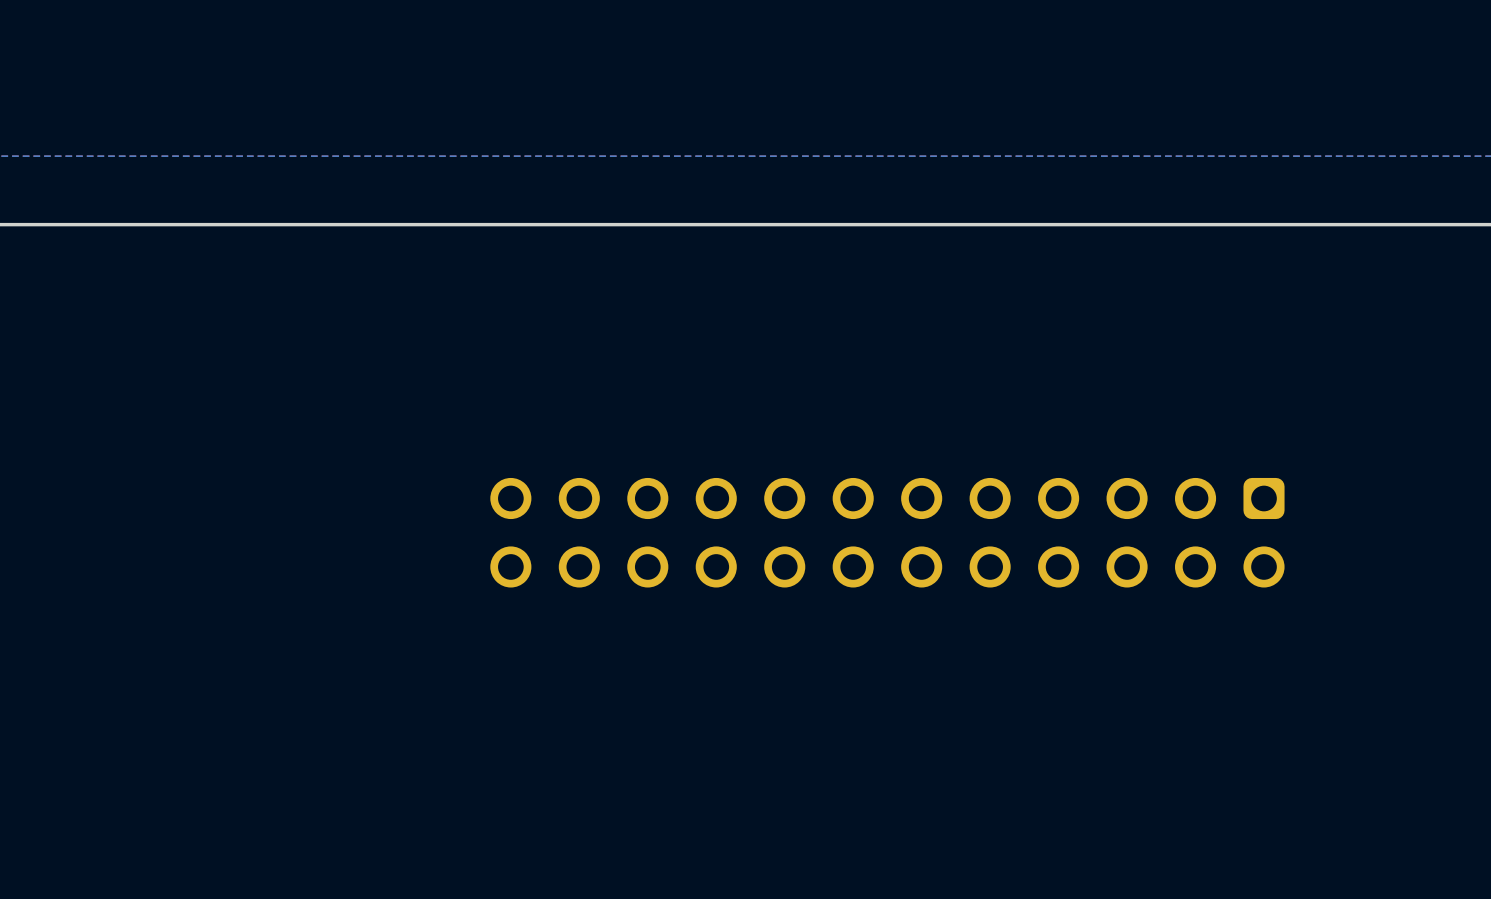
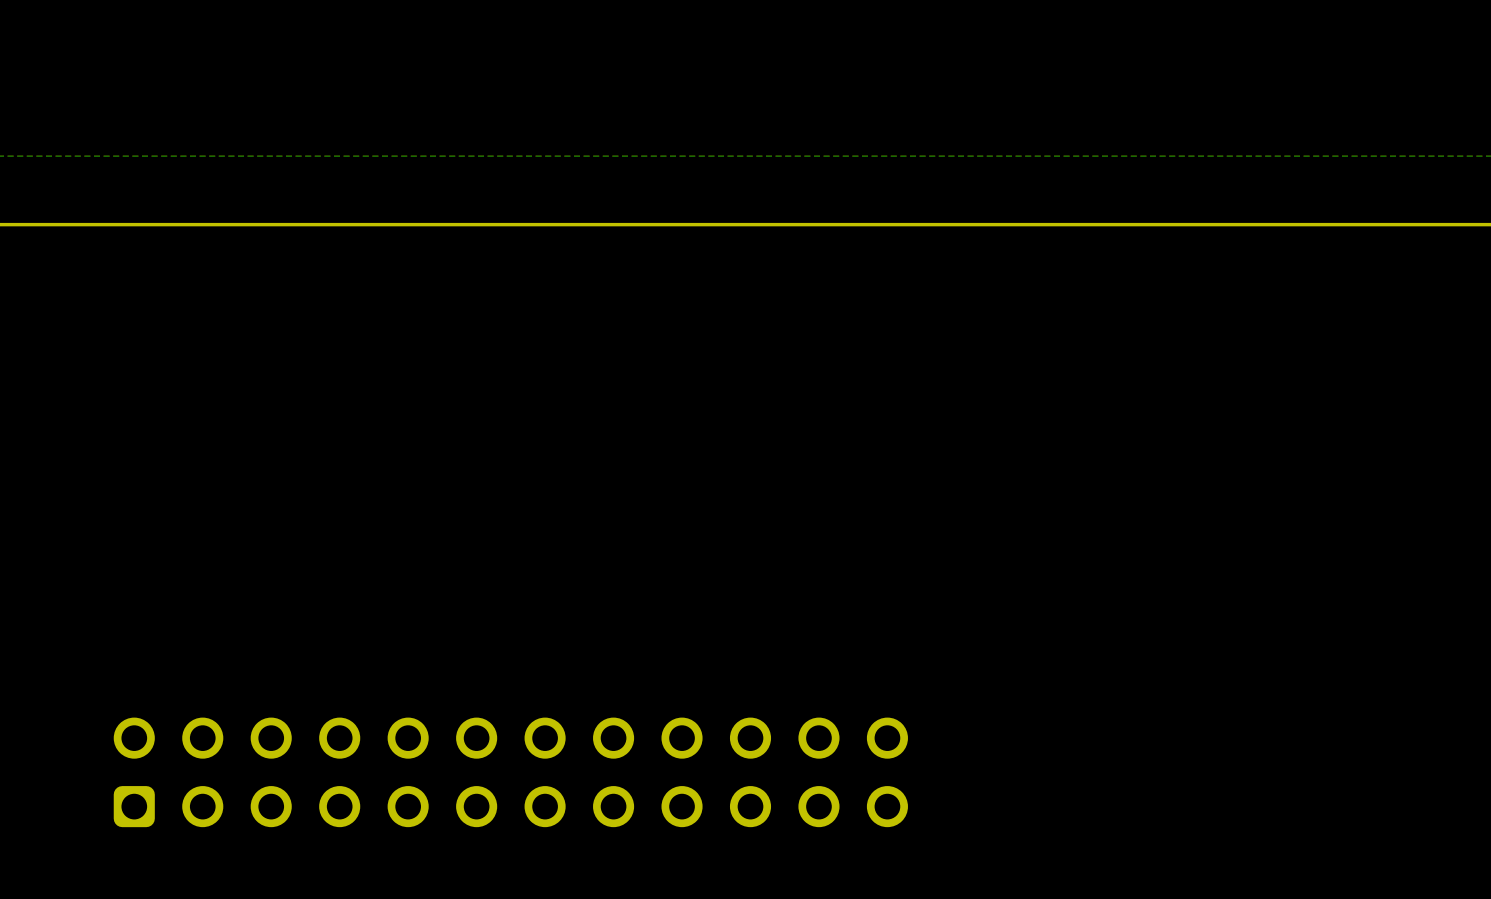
part rotation: 0° (887, 532) -> 180° (510, 772)

